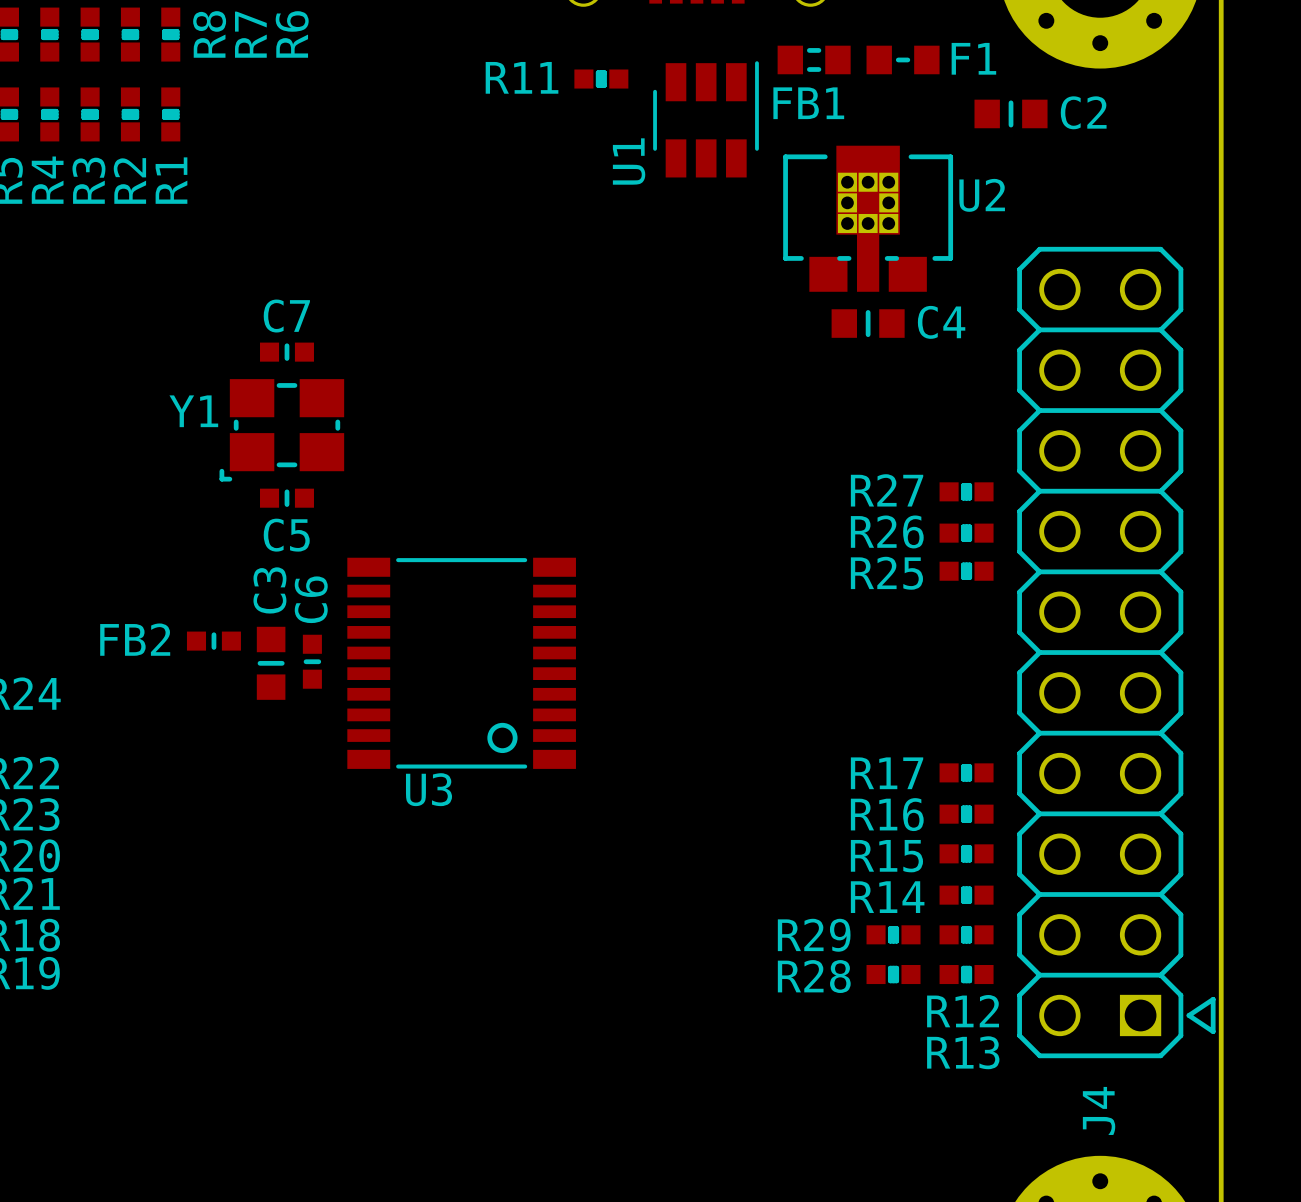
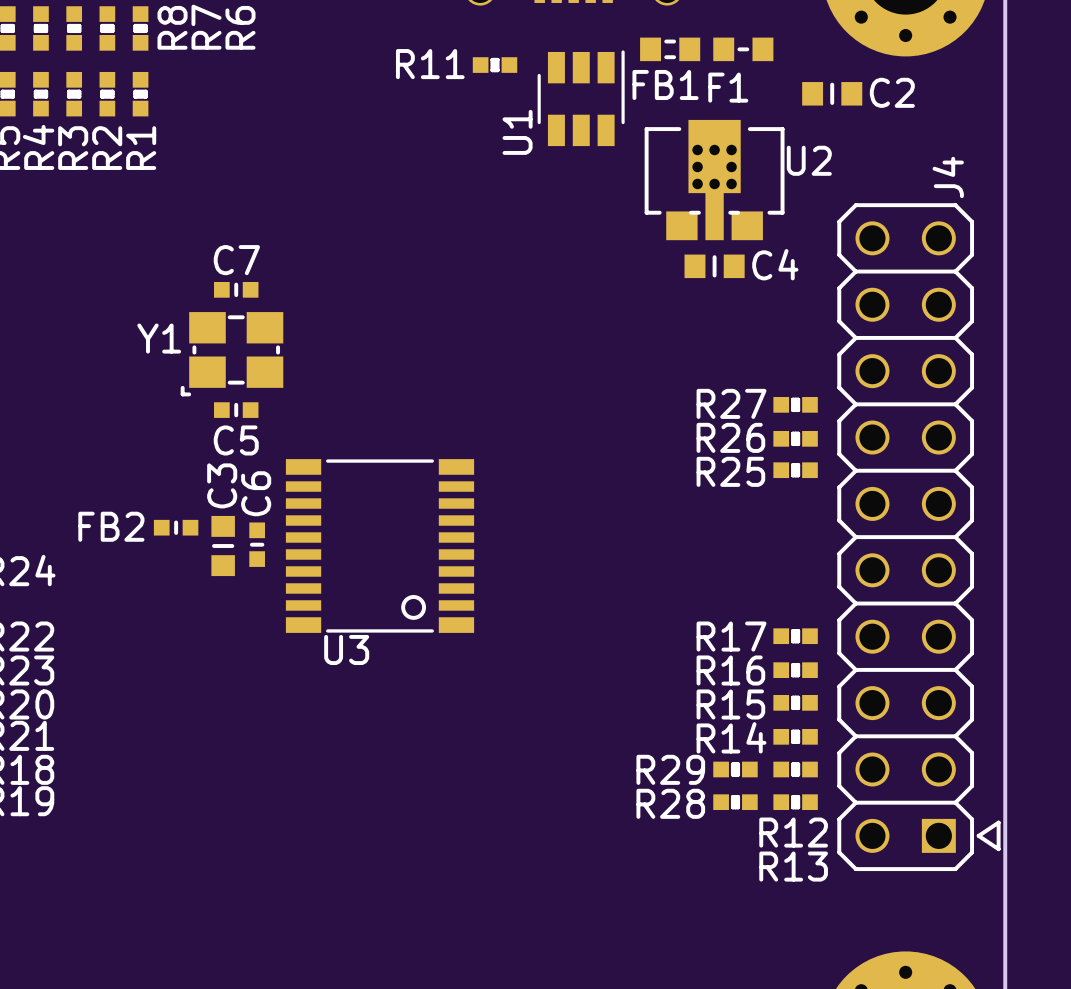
F1 name position: F1 (973, 58) -> F1 (728, 87)
J4 name position: J4 (1099, 1110) -> J4 (948, 177)

